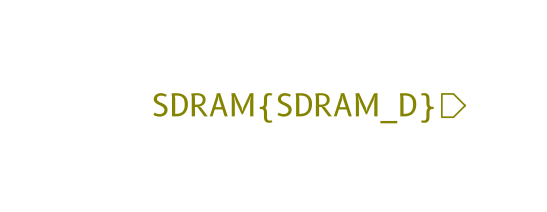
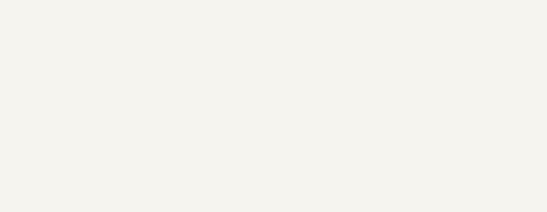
hierarchical label: SDRAM{SDRAM_D} (293, 108) -> none

